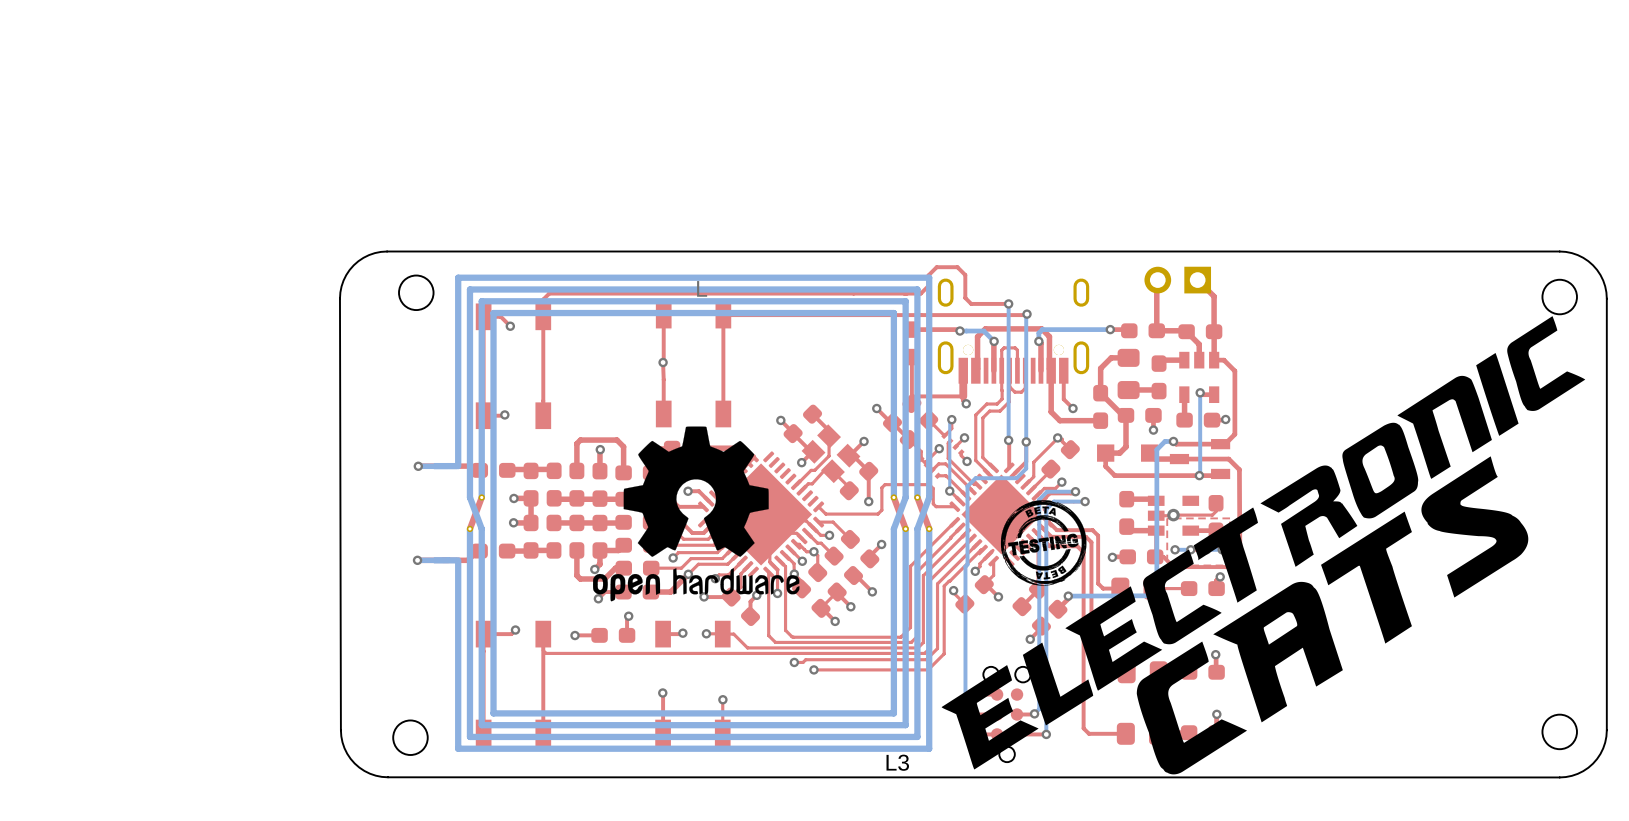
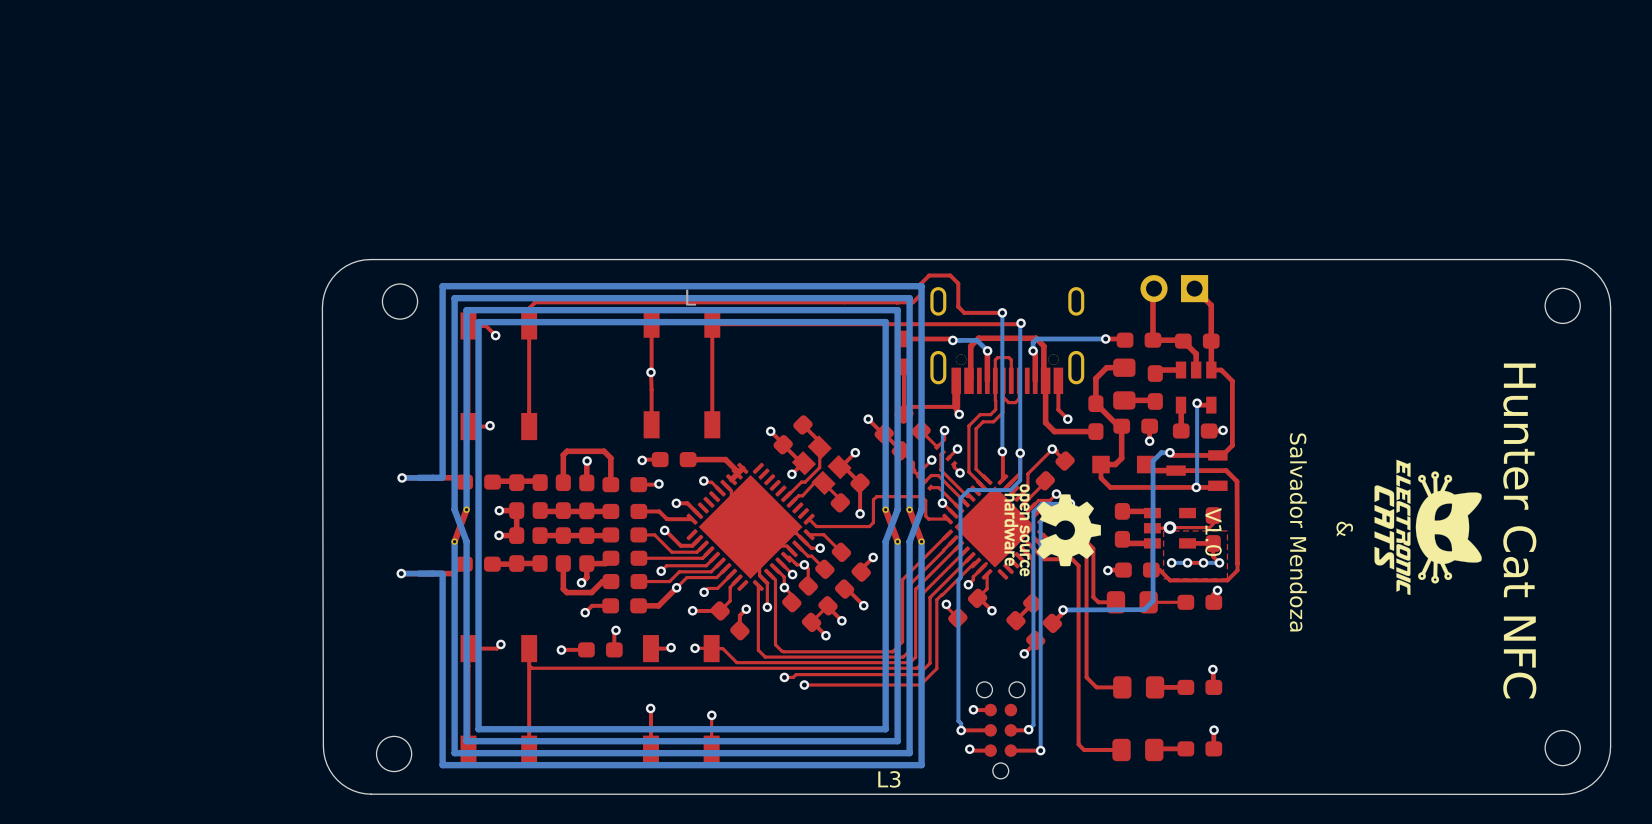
drawing: [941, 316, 1586, 775] -> none
drawing: [593, 426, 800, 602] -> none
drawing: none -> [1374, 459, 1482, 596]
drawing: none -> [1004, 484, 1101, 577]
text: none -> & (1344, 529)
text: none -> Hunter Cat NFC (1519, 530)
text: none -> V1.0 (1213, 532)
text: none -> Salvador Mendoza (1298, 532)

